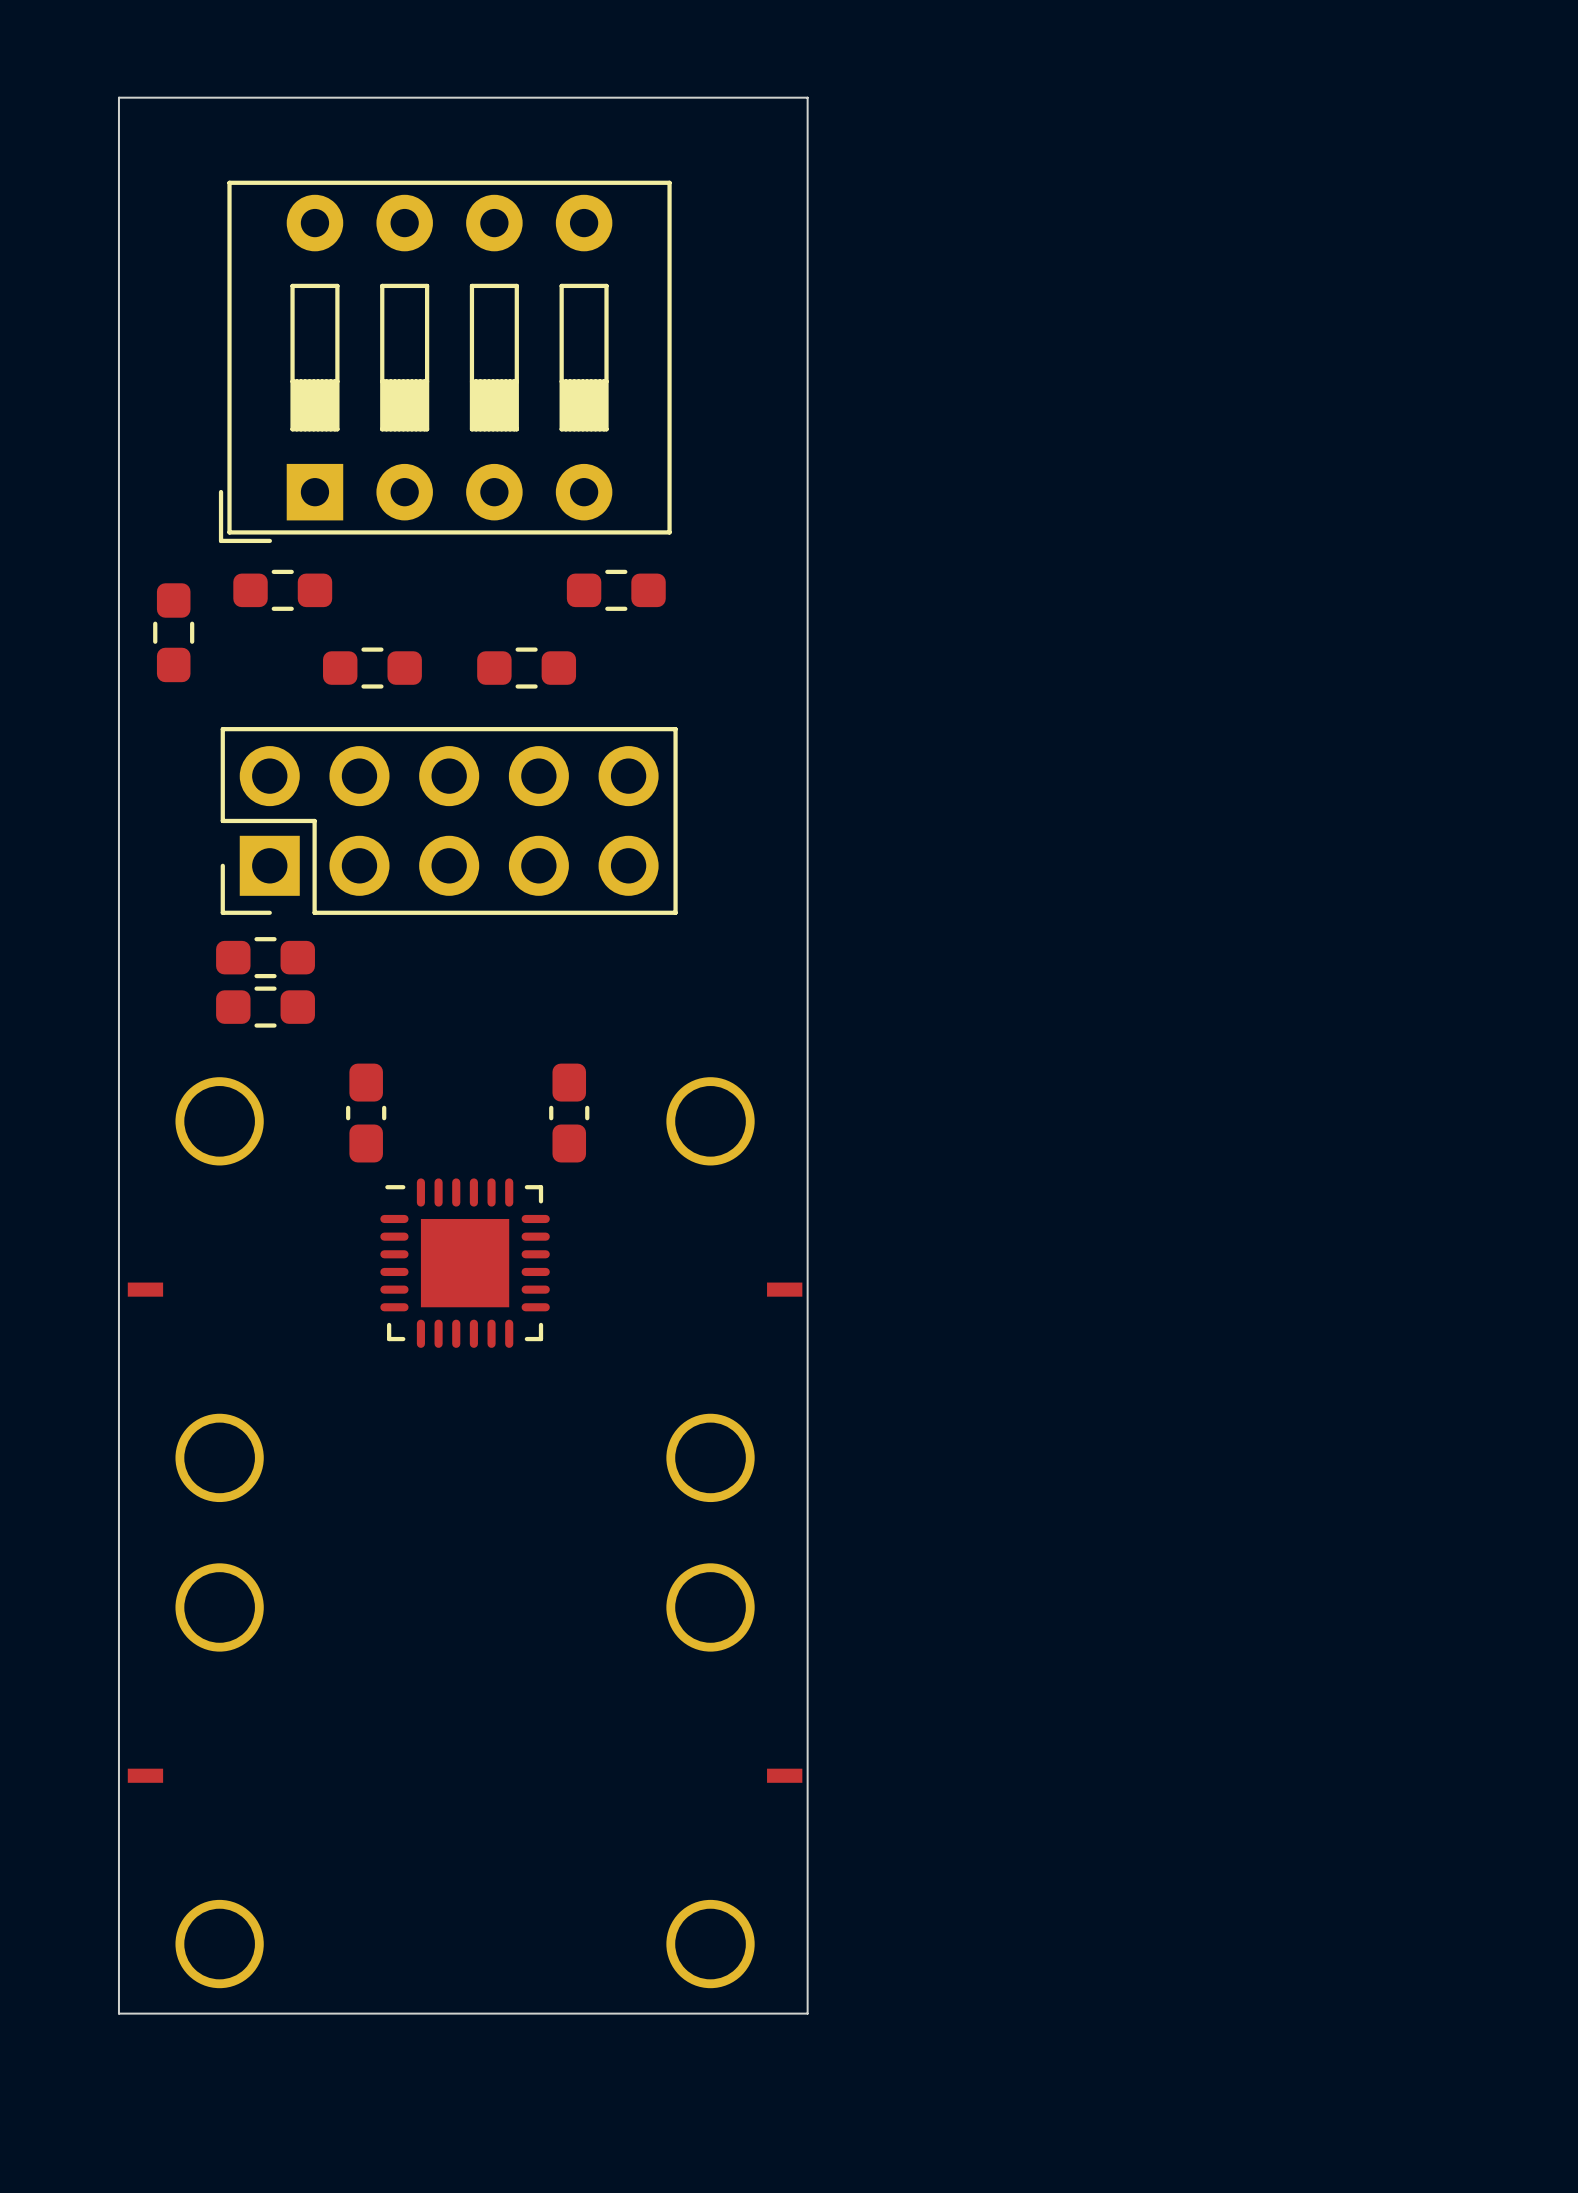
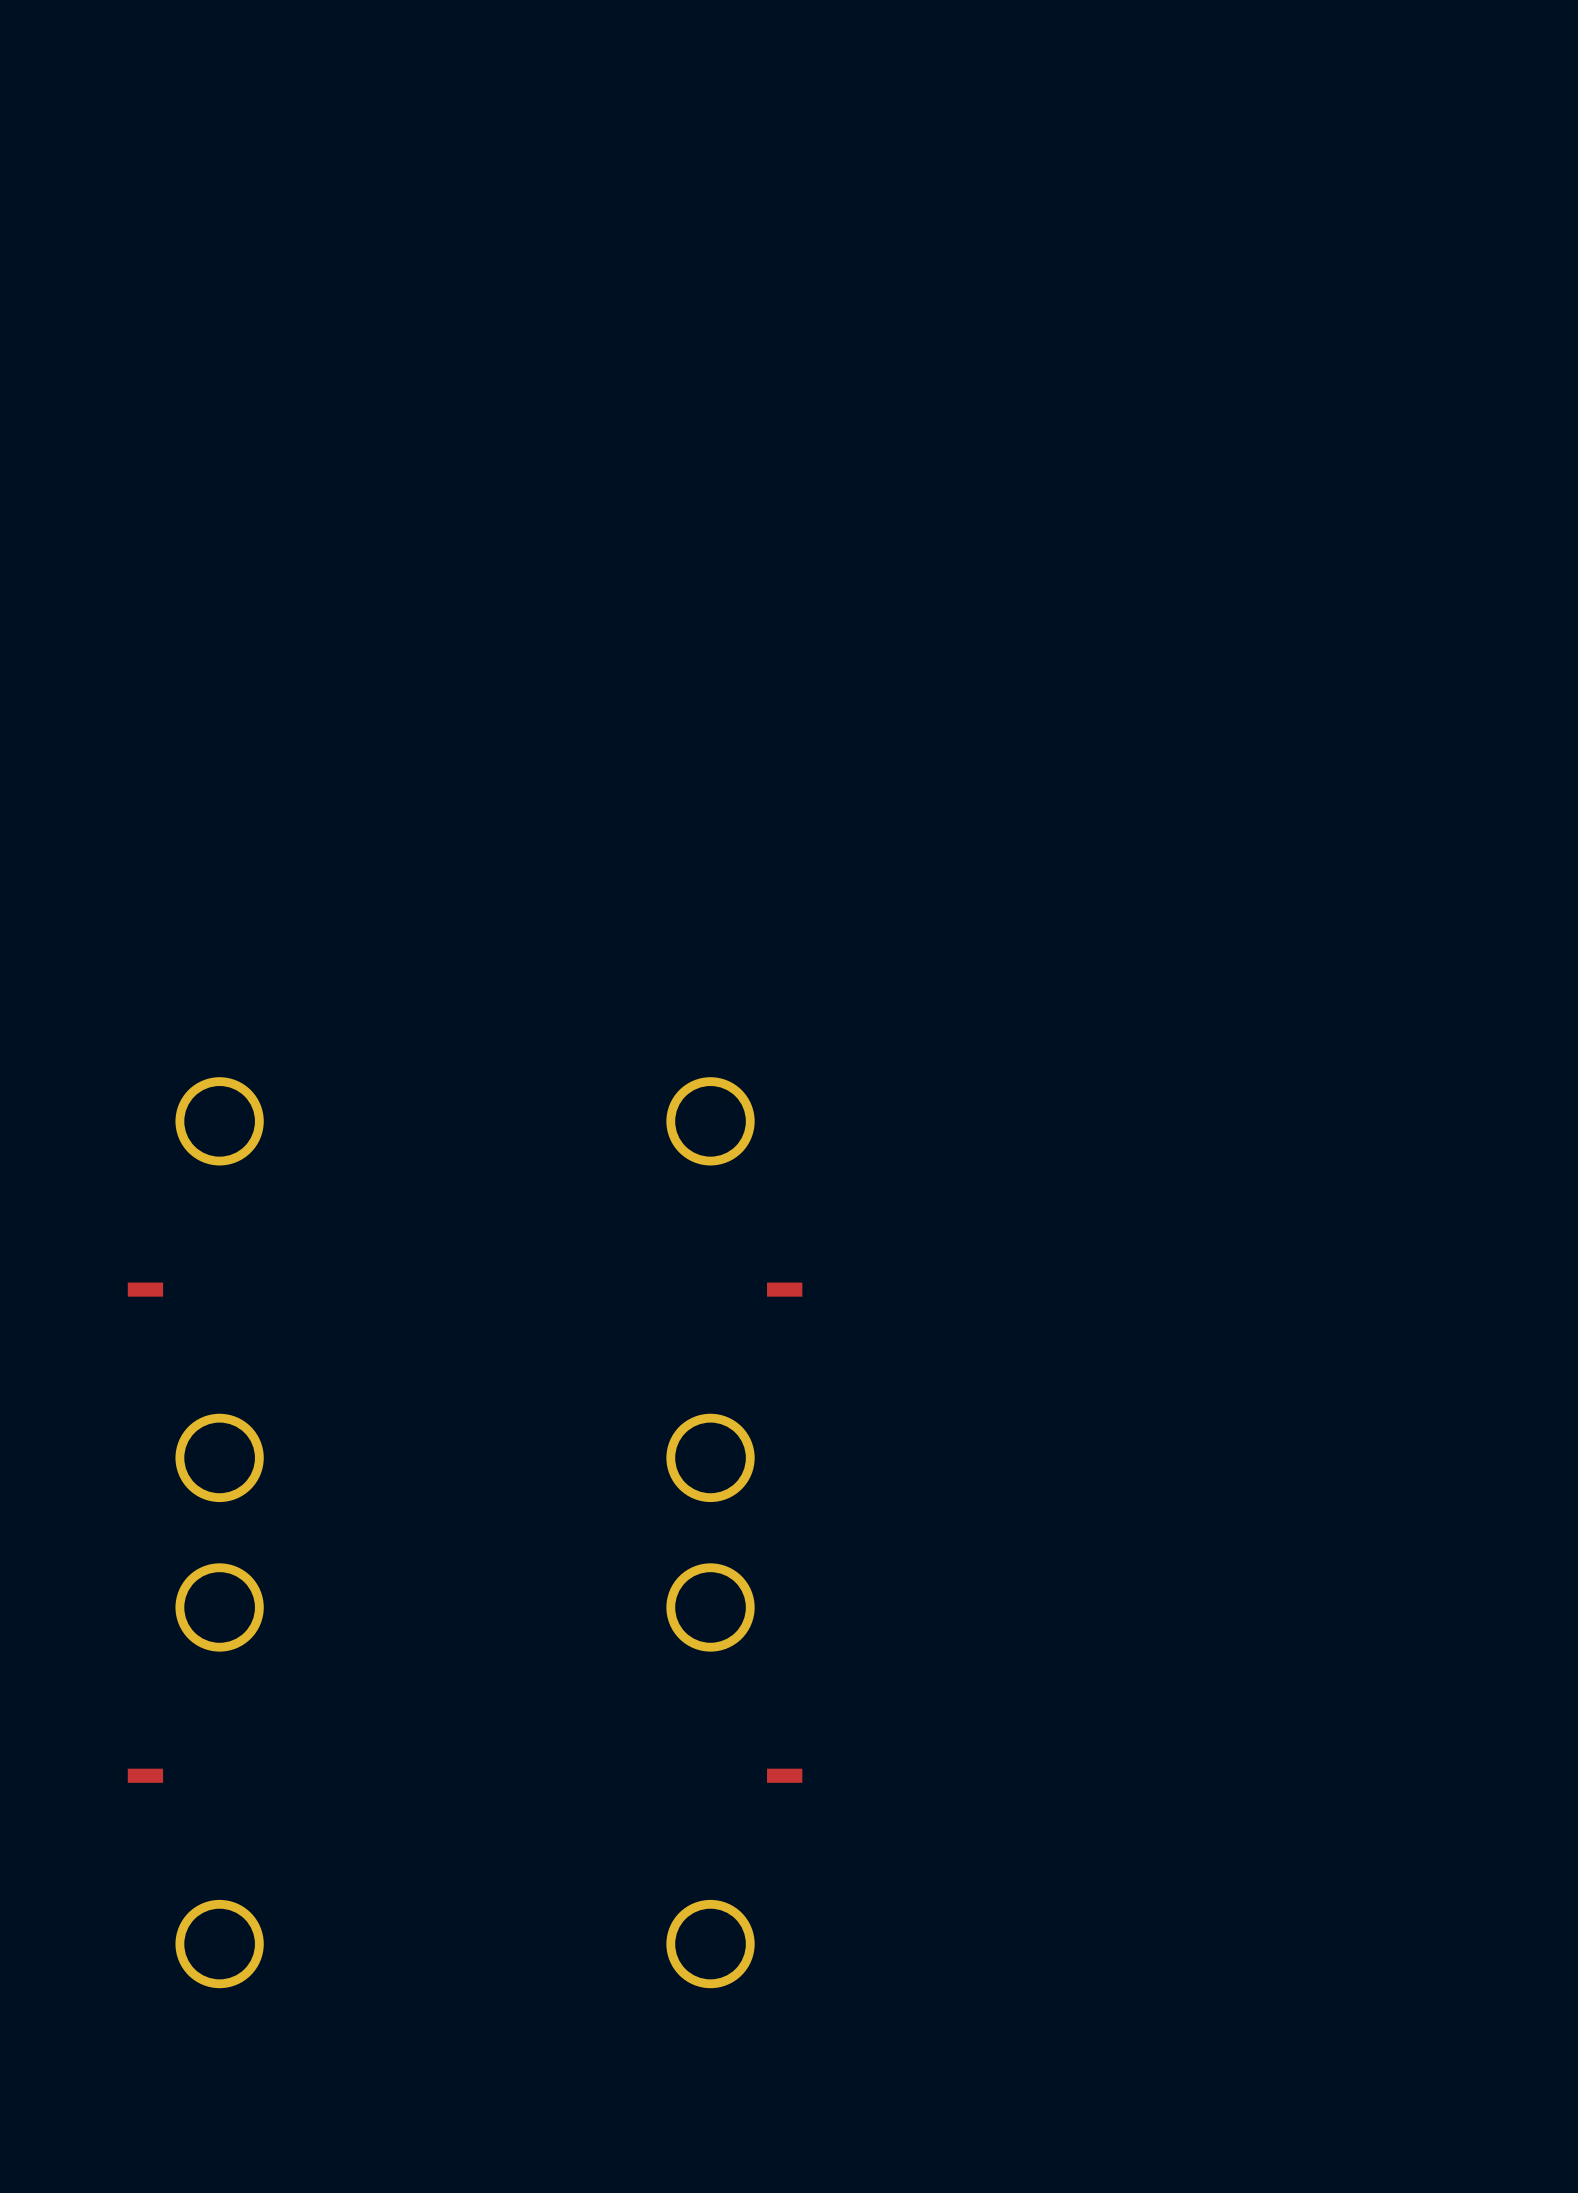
board edge: (118, 97) (807, 97) (807, 2013) (118, 2013) (118, 97) -> none
part: (445, 361) -> none
part: (282, 590) -> none
part: (616, 590) -> none
part: (173, 632) -> none
part: (372, 668) -> none
part: (526, 668) -> none
part: (449, 820) -> none
part: (265, 957) -> none
part: (265, 1007) -> none
part: (366, 1113) -> none
part: (569, 1113) -> none
part: (465, 1263) -> none

